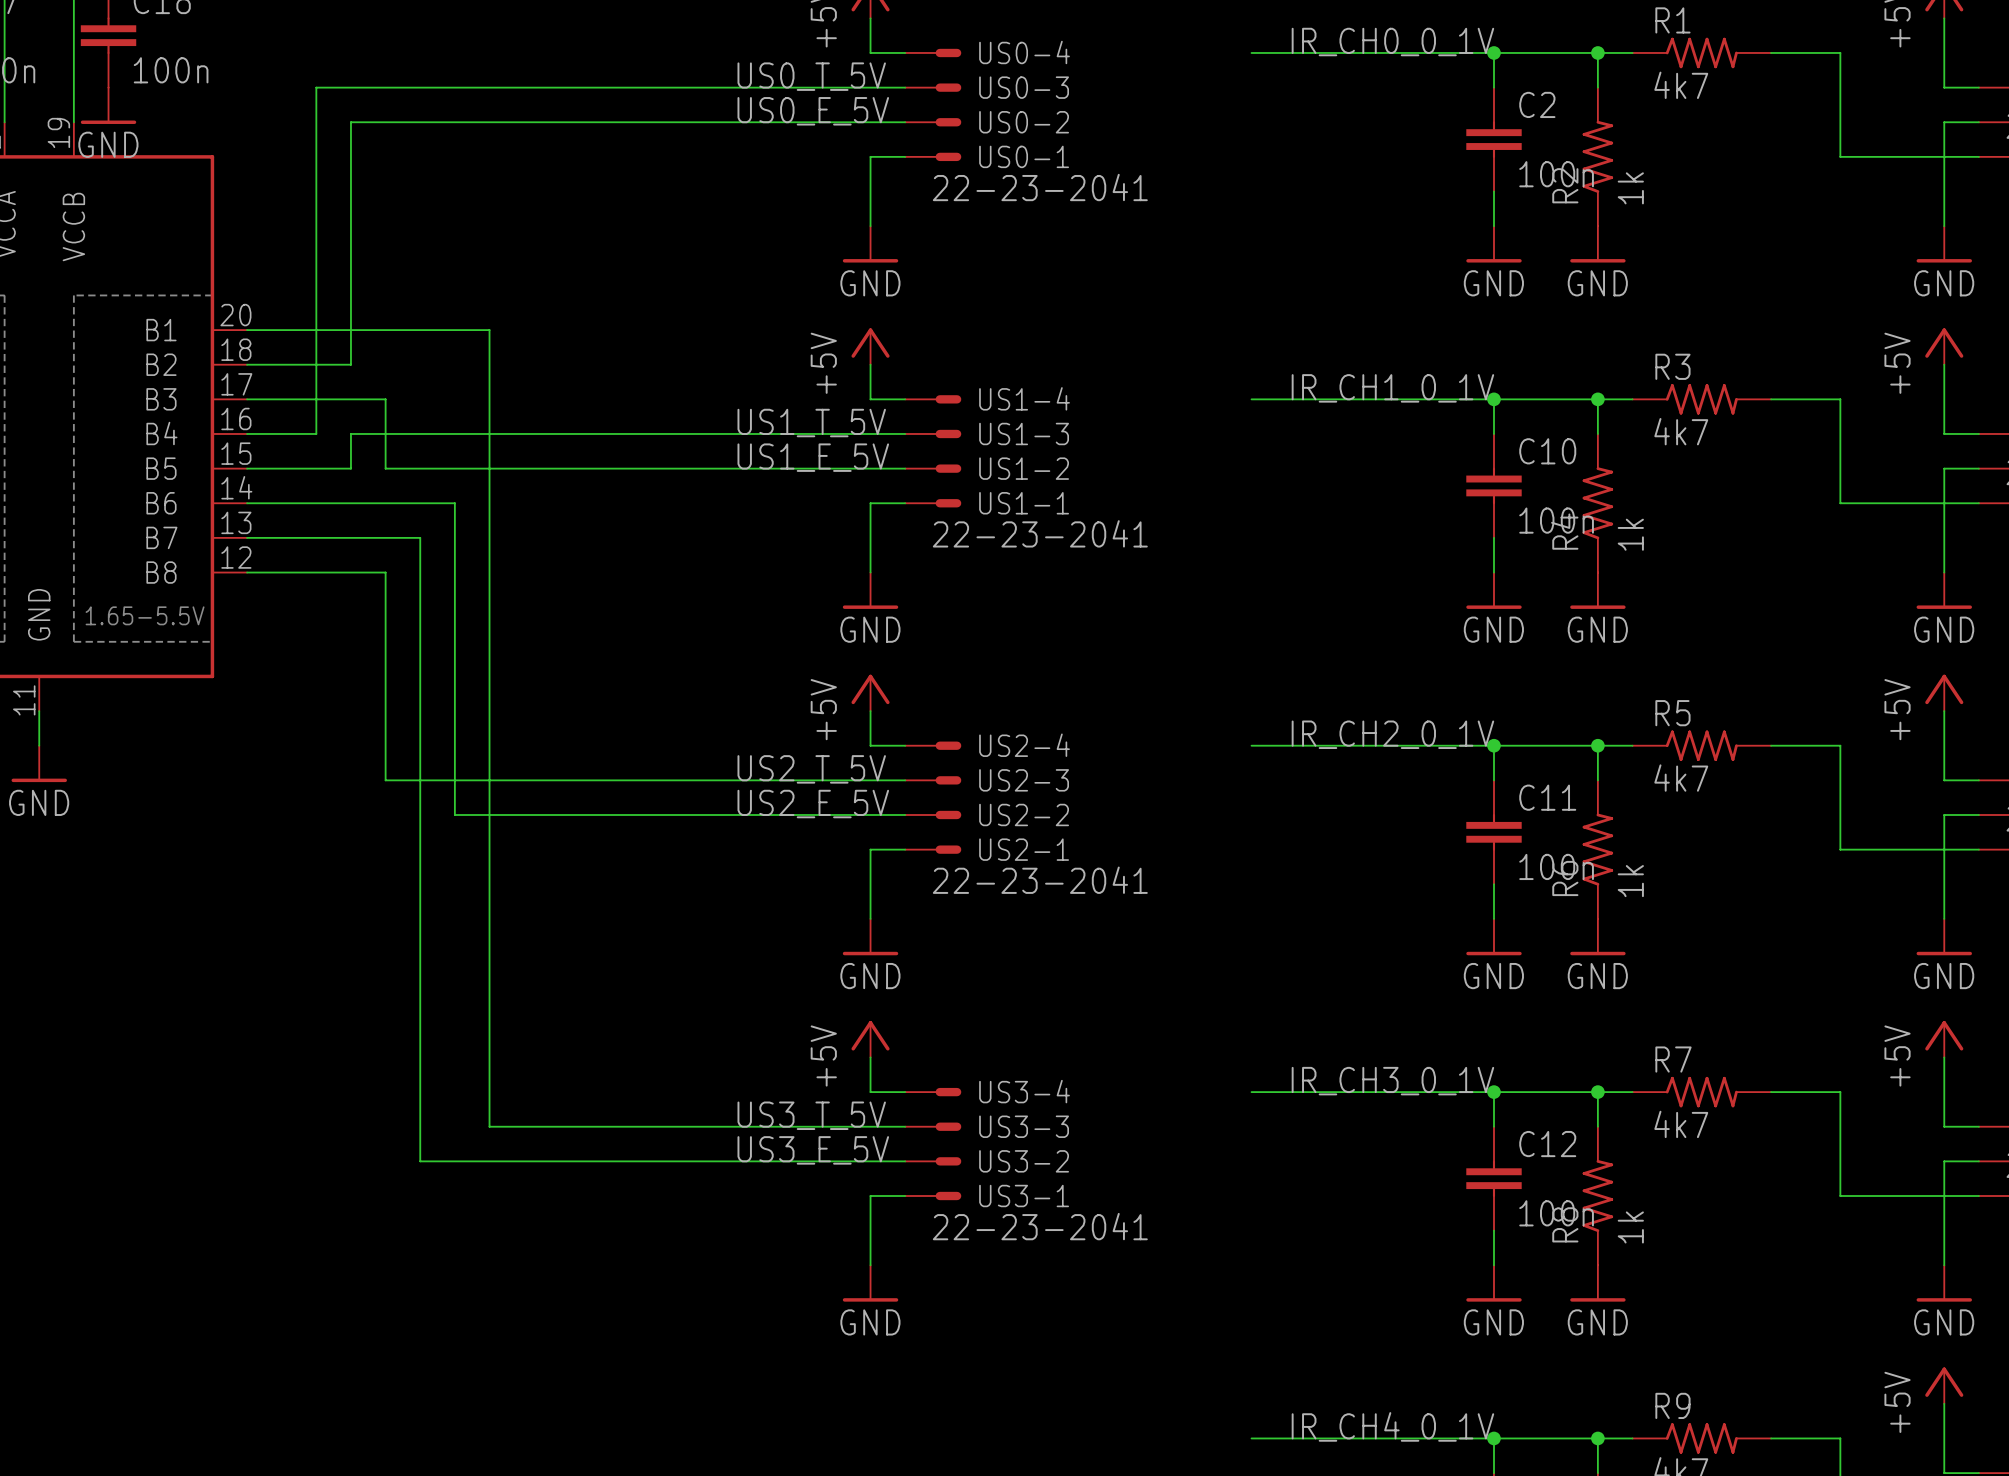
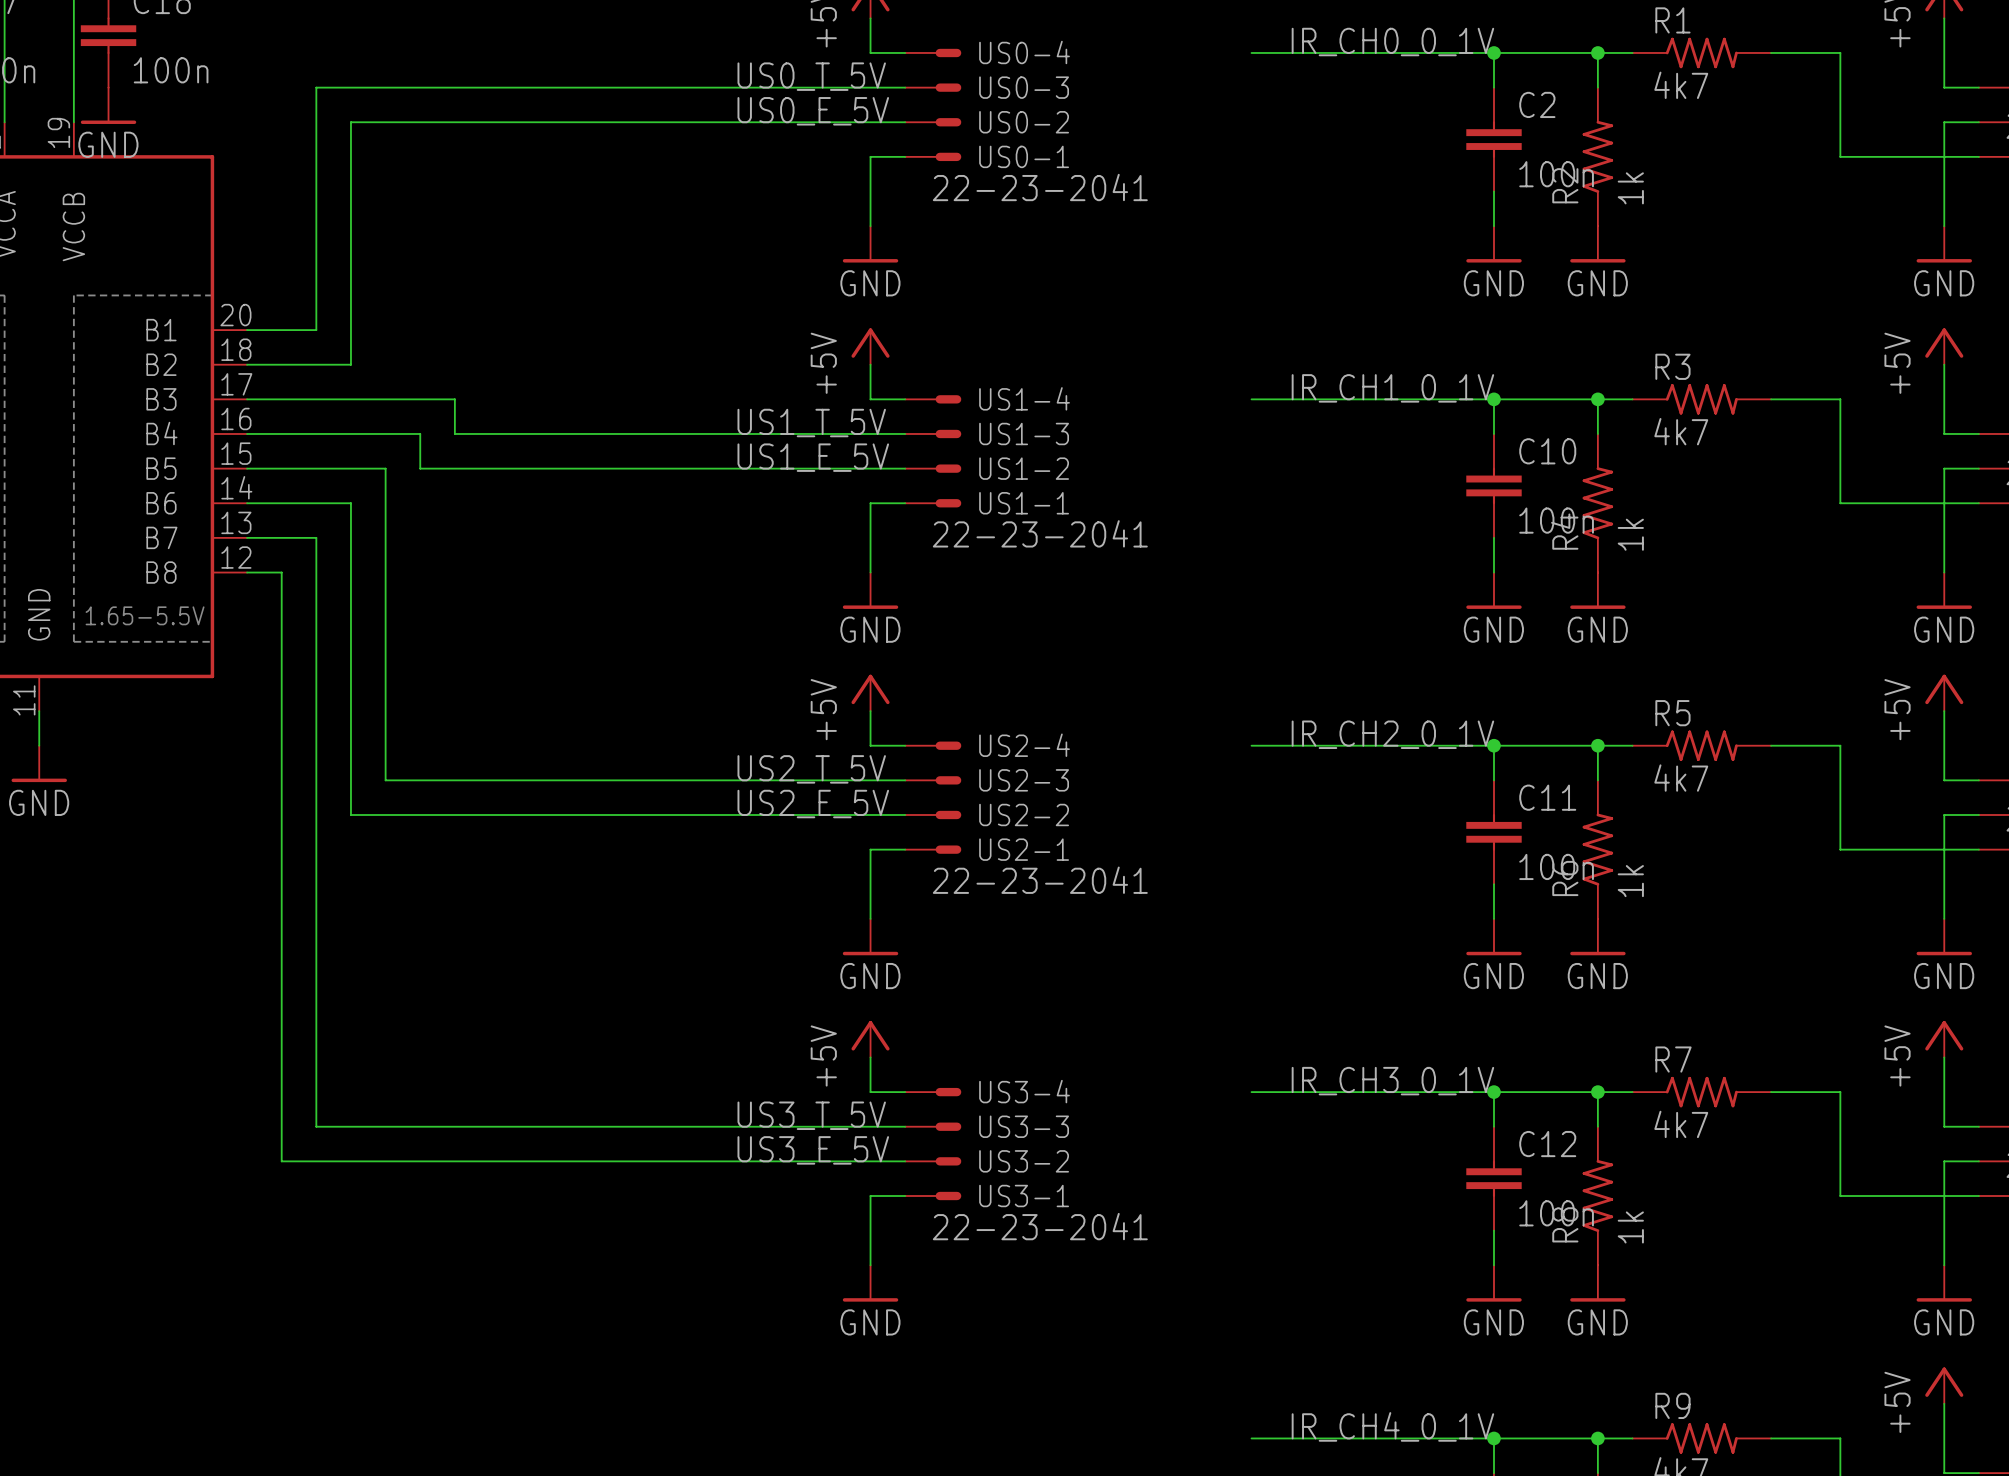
wire: (385, 399) (385, 468) (420, 468) -> (385, 399) (454, 399) (454, 433)
wire: (316, 433) (316, 330) (489, 330) (489, 1126) -> (316, 537) (316, 1126) (489, 1126)
wire: (350, 433) (350, 468) -> (350, 433) (316, 433)
wire: (420, 433) (454, 433) -> (420, 433) (420, 468)
wire: (350, 503) (454, 503) (454, 814) -> (350, 503) (350, 814) (454, 814)
wire: (316, 537) (420, 537) (420, 1161) -> (281, 572) (281, 1161) (420, 1161)
wire: (281, 572) (385, 572) -> (350, 468) (385, 468) (385, 572)

